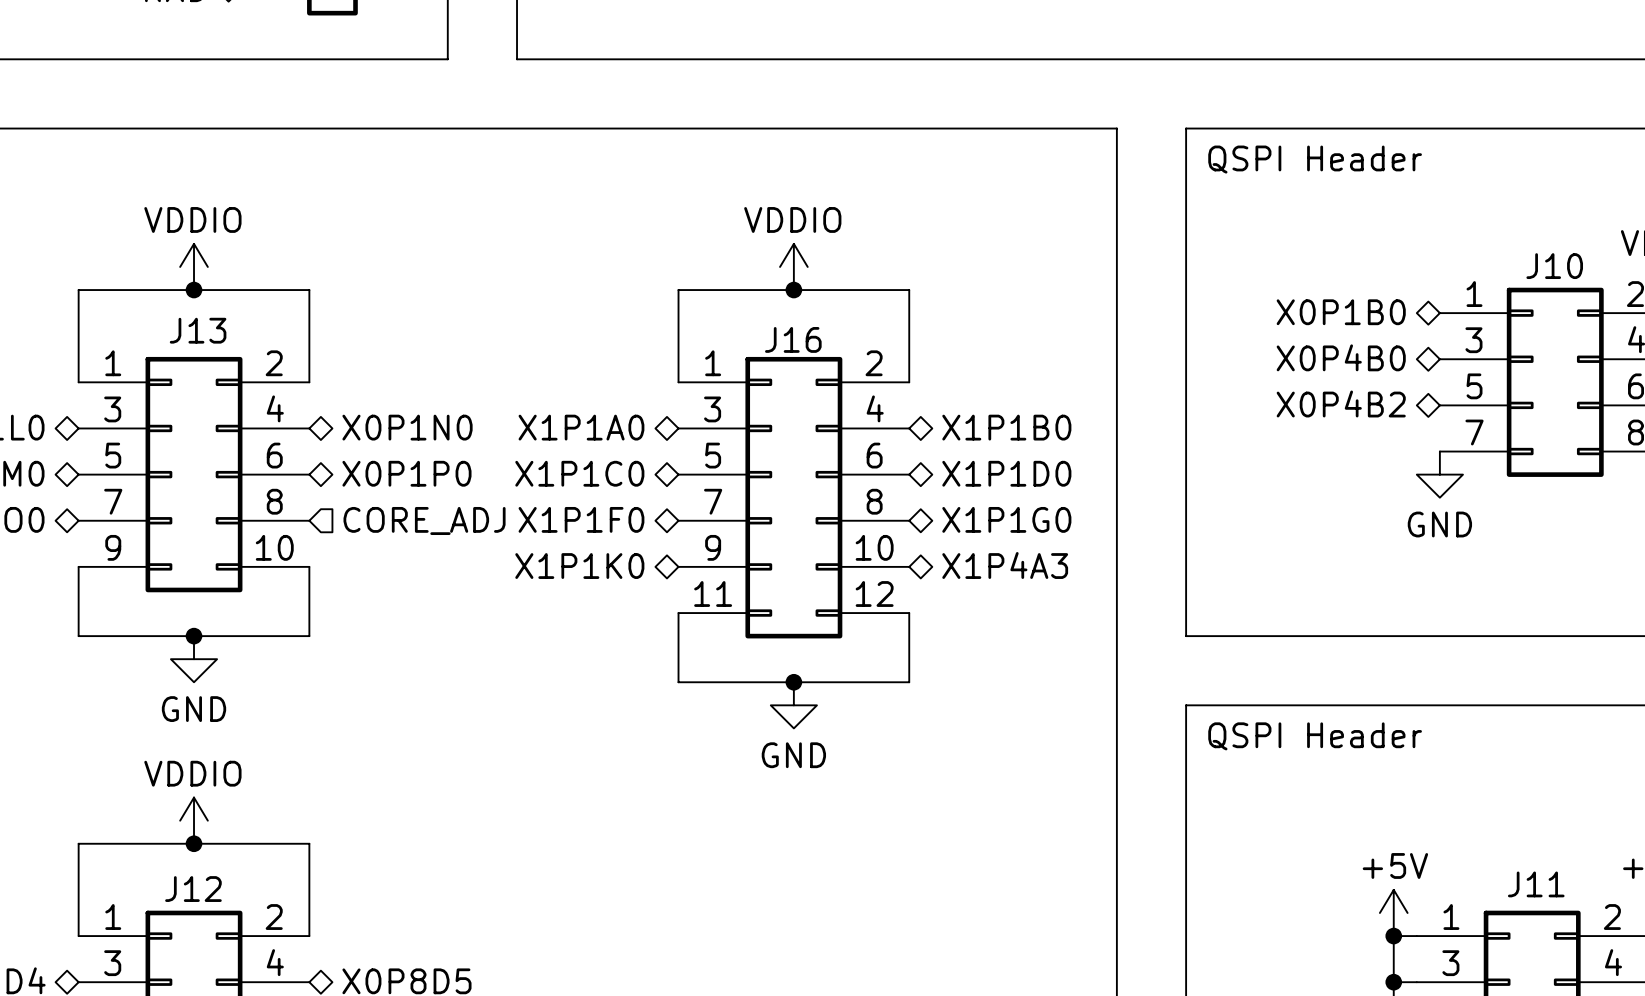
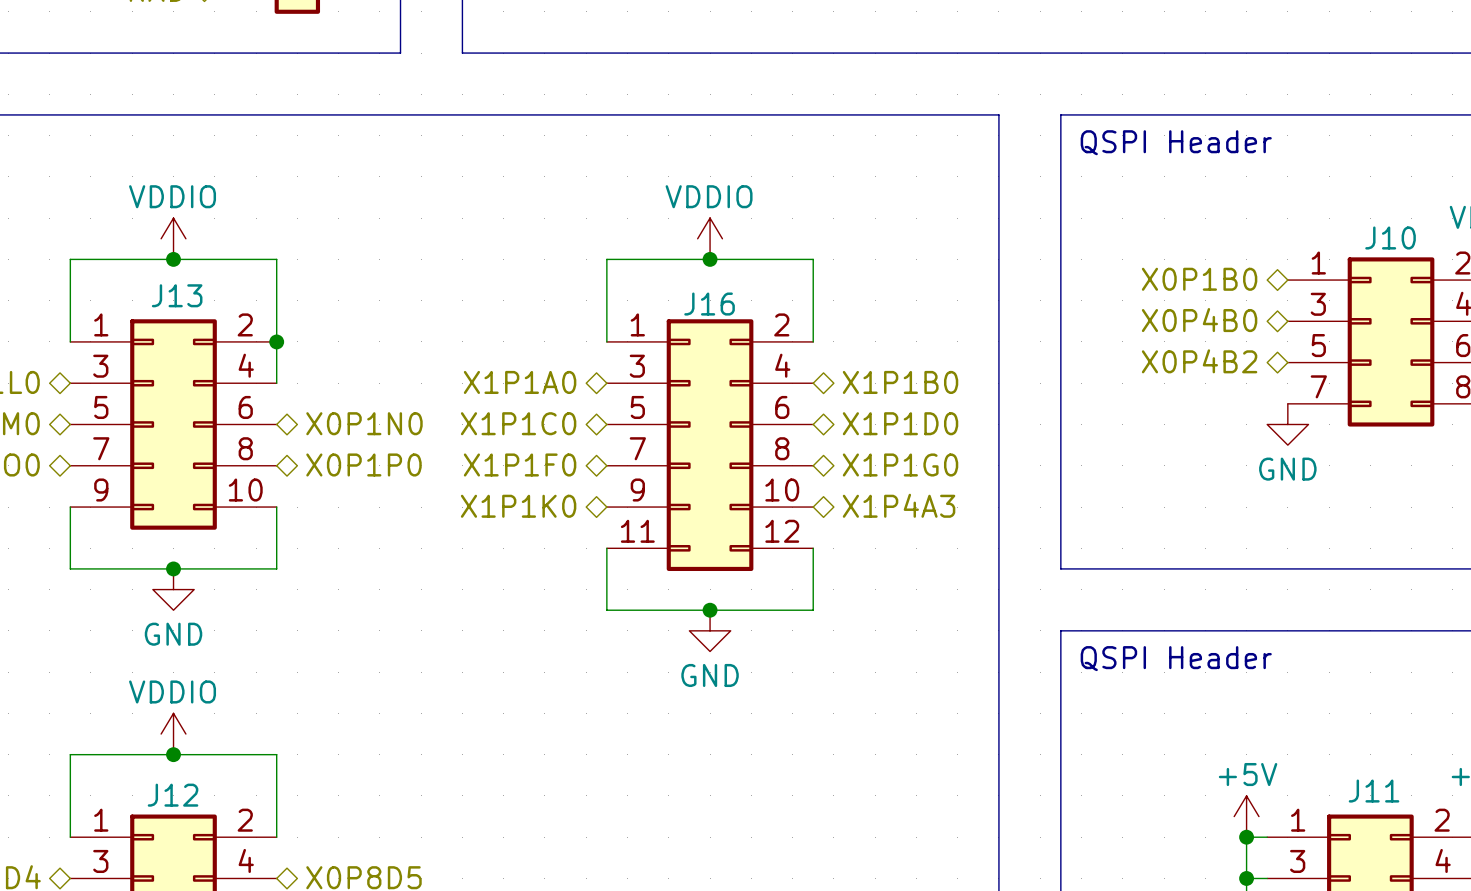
wire: none -> (276, 341) (276, 383)
junction: none -> (276, 341)
hierarchical label: X0P1N0 (407, 427) -> none
hierarchical label: X0P1P0 (406, 473) -> X0P1N0 (364, 423)
hierarchical label shape: input (424, 520) -> bidirectional (363, 464)
hierarchical label: CORE_ADJ (424, 520) -> X0P1P0 (363, 464)

